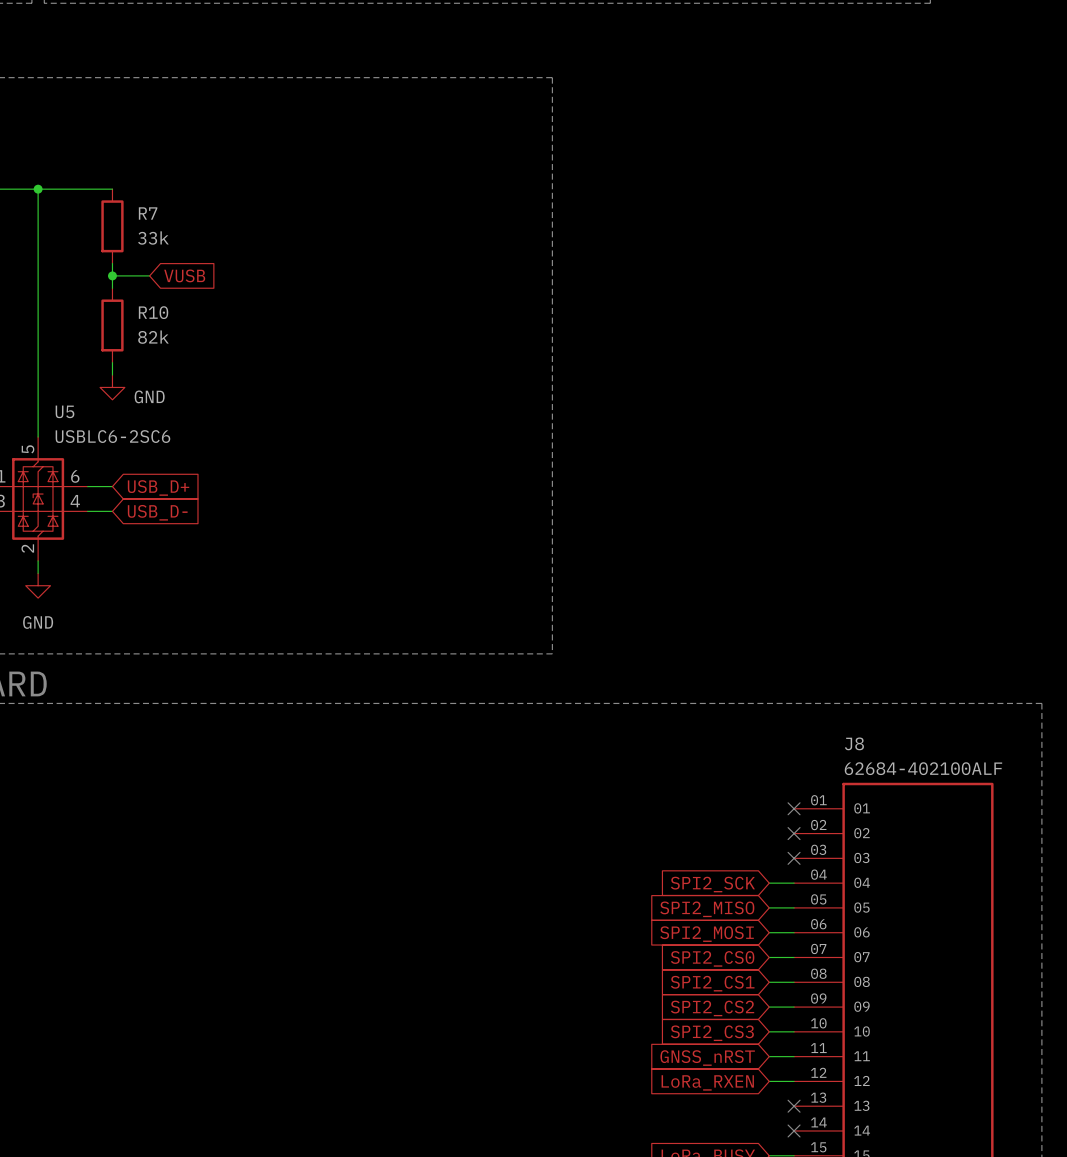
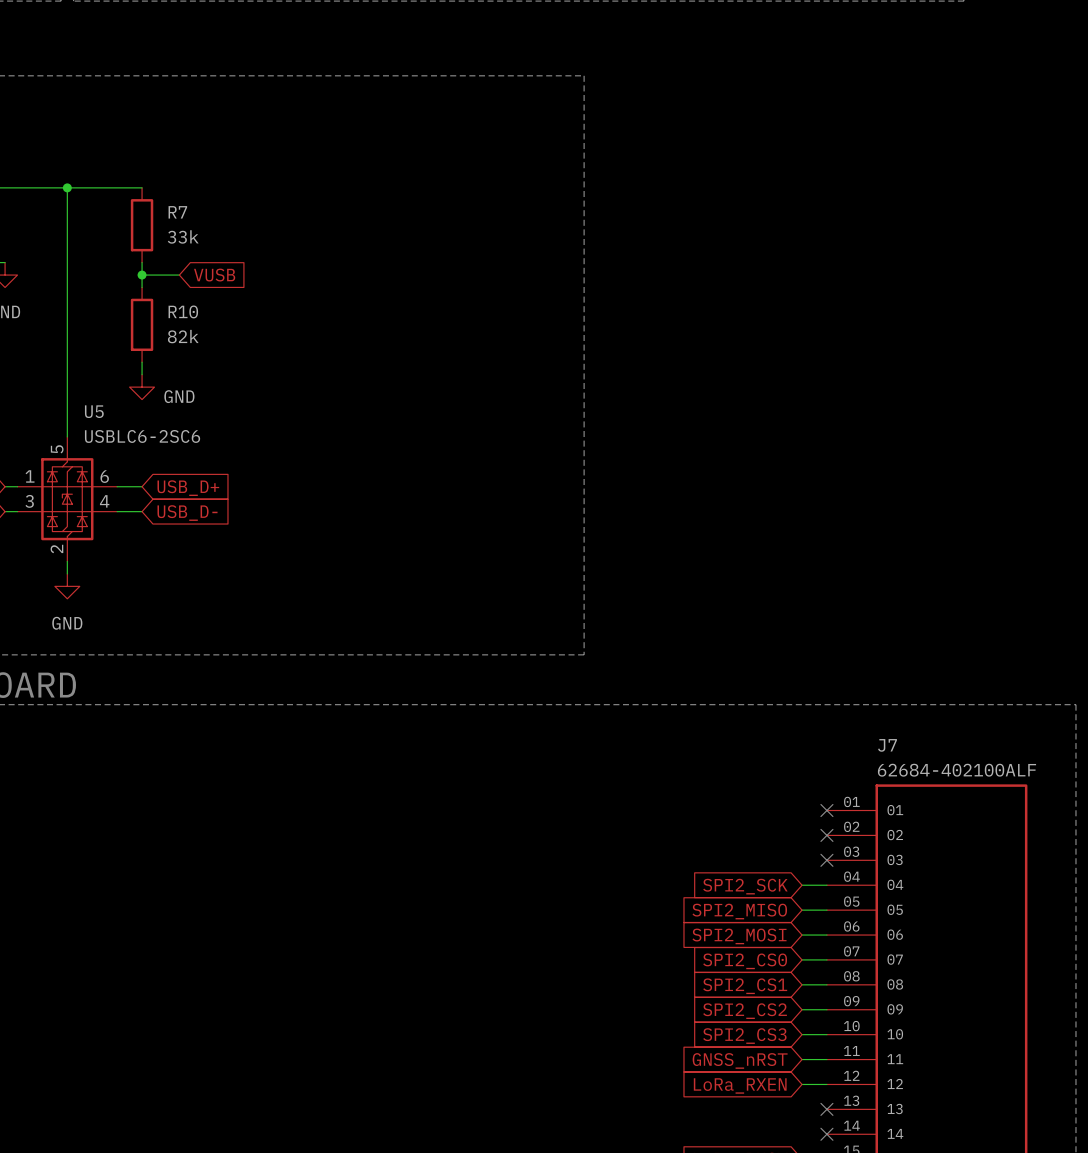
J8 name: J8 (854, 743) -> J7 (887, 745)

